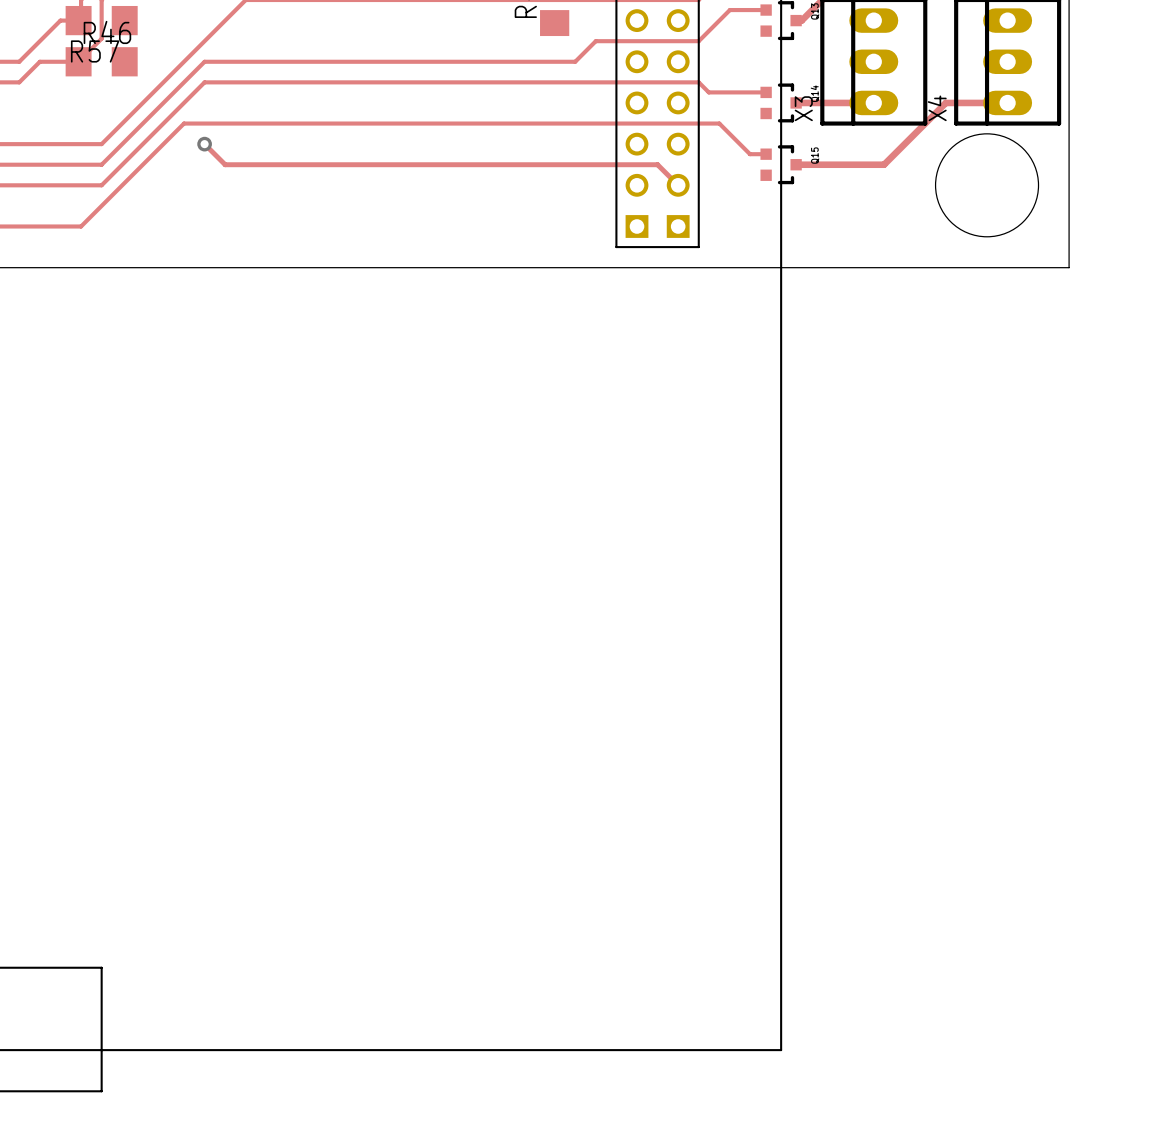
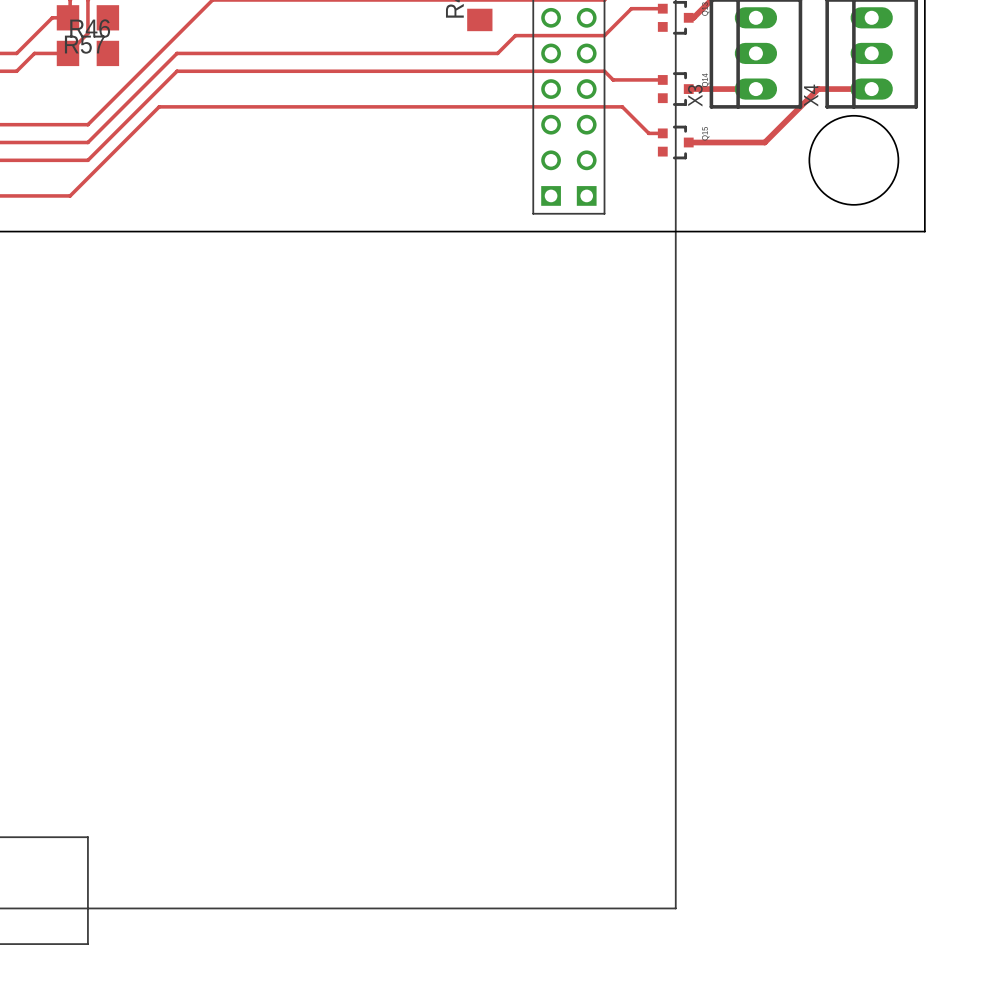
track: (204, 144) (225, 164) (657, 164) (678, 185) -> none
via: (204, 144) -> none

